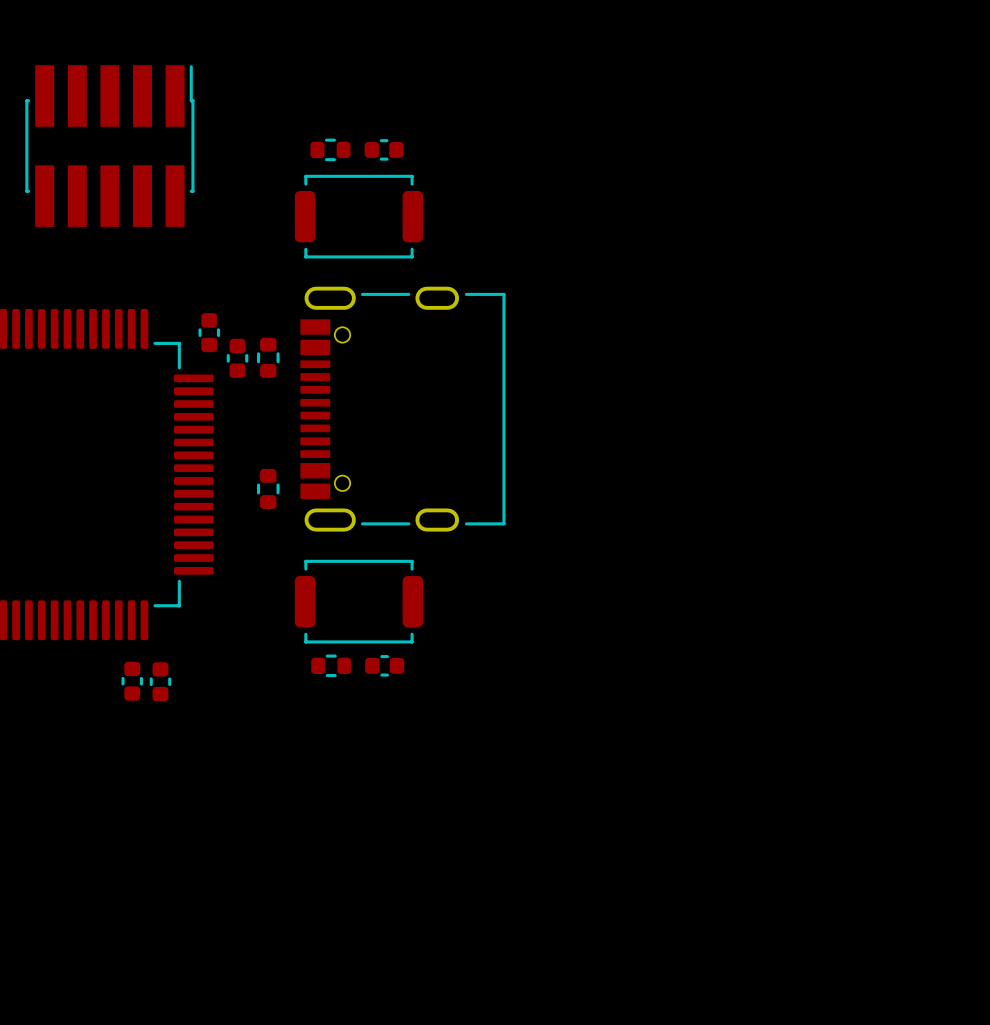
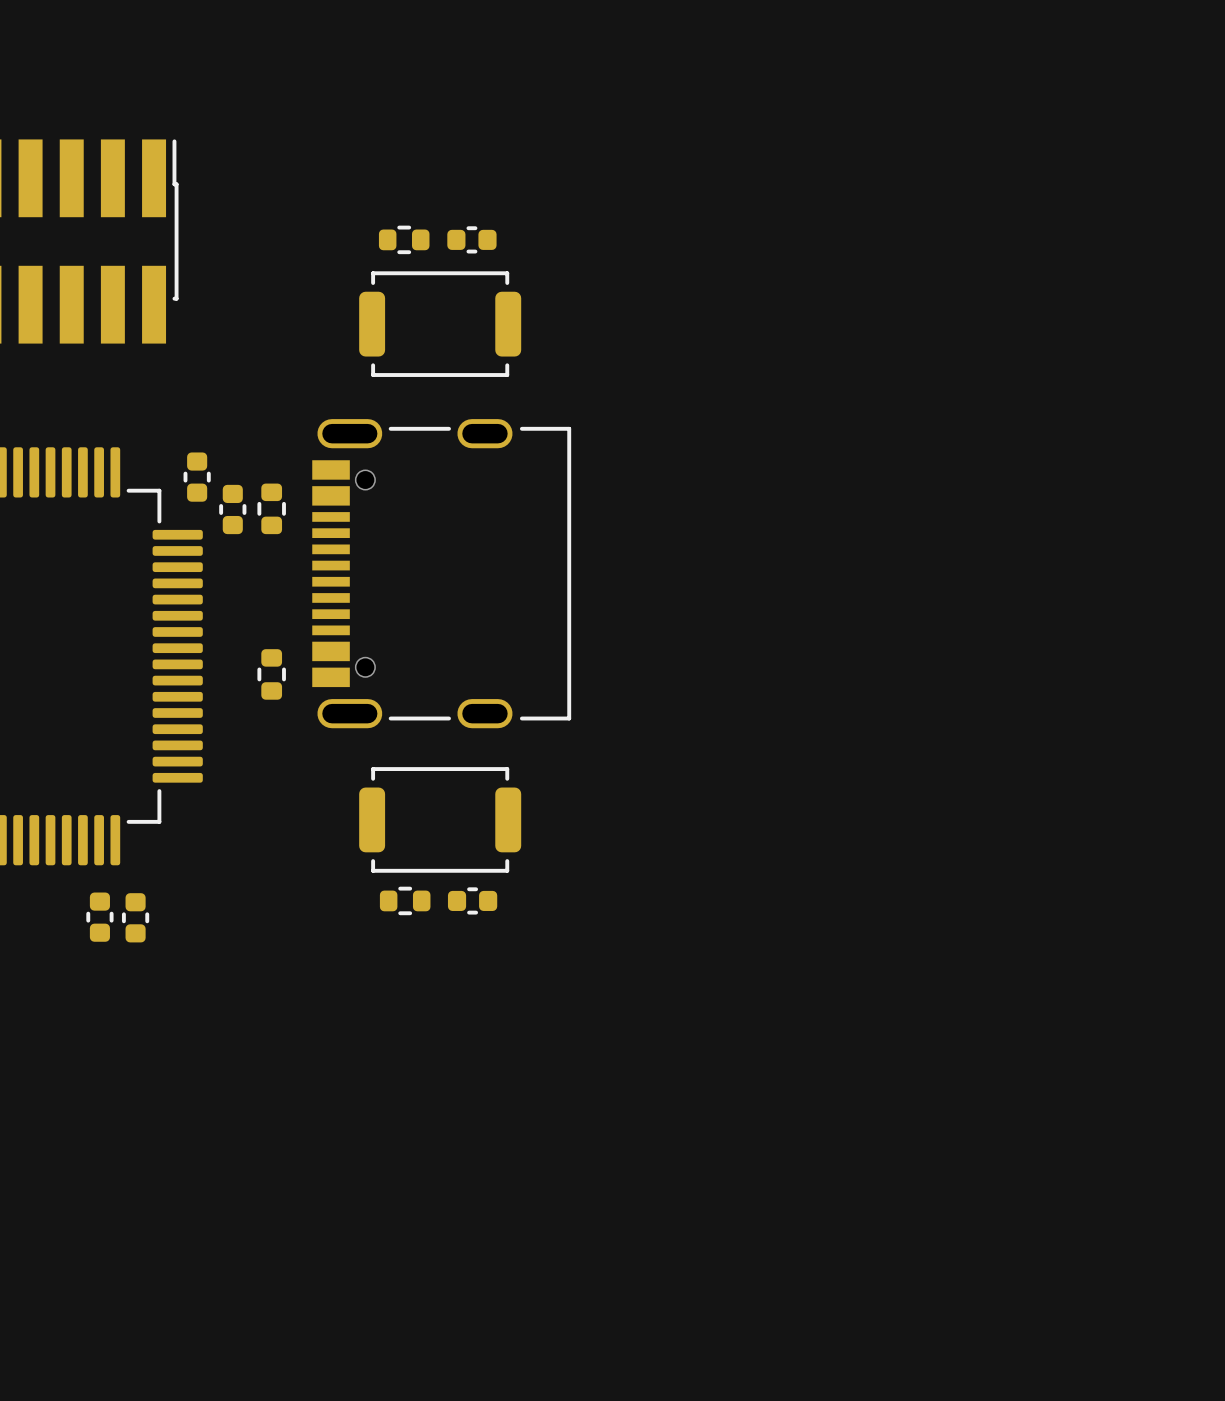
part footprint: [364, 139, 404, 161] -> [378, 225, 430, 255]
part: none -> (471, 239)
part: (330, 149) -> none
part position: (358, 216) -> (440, 324)
part position: (358, 601) -> (440, 819)
part footprint: [365, 655, 405, 677] -> [379, 886, 431, 916]
part: (331, 665) -> none
part: none -> (472, 900)

